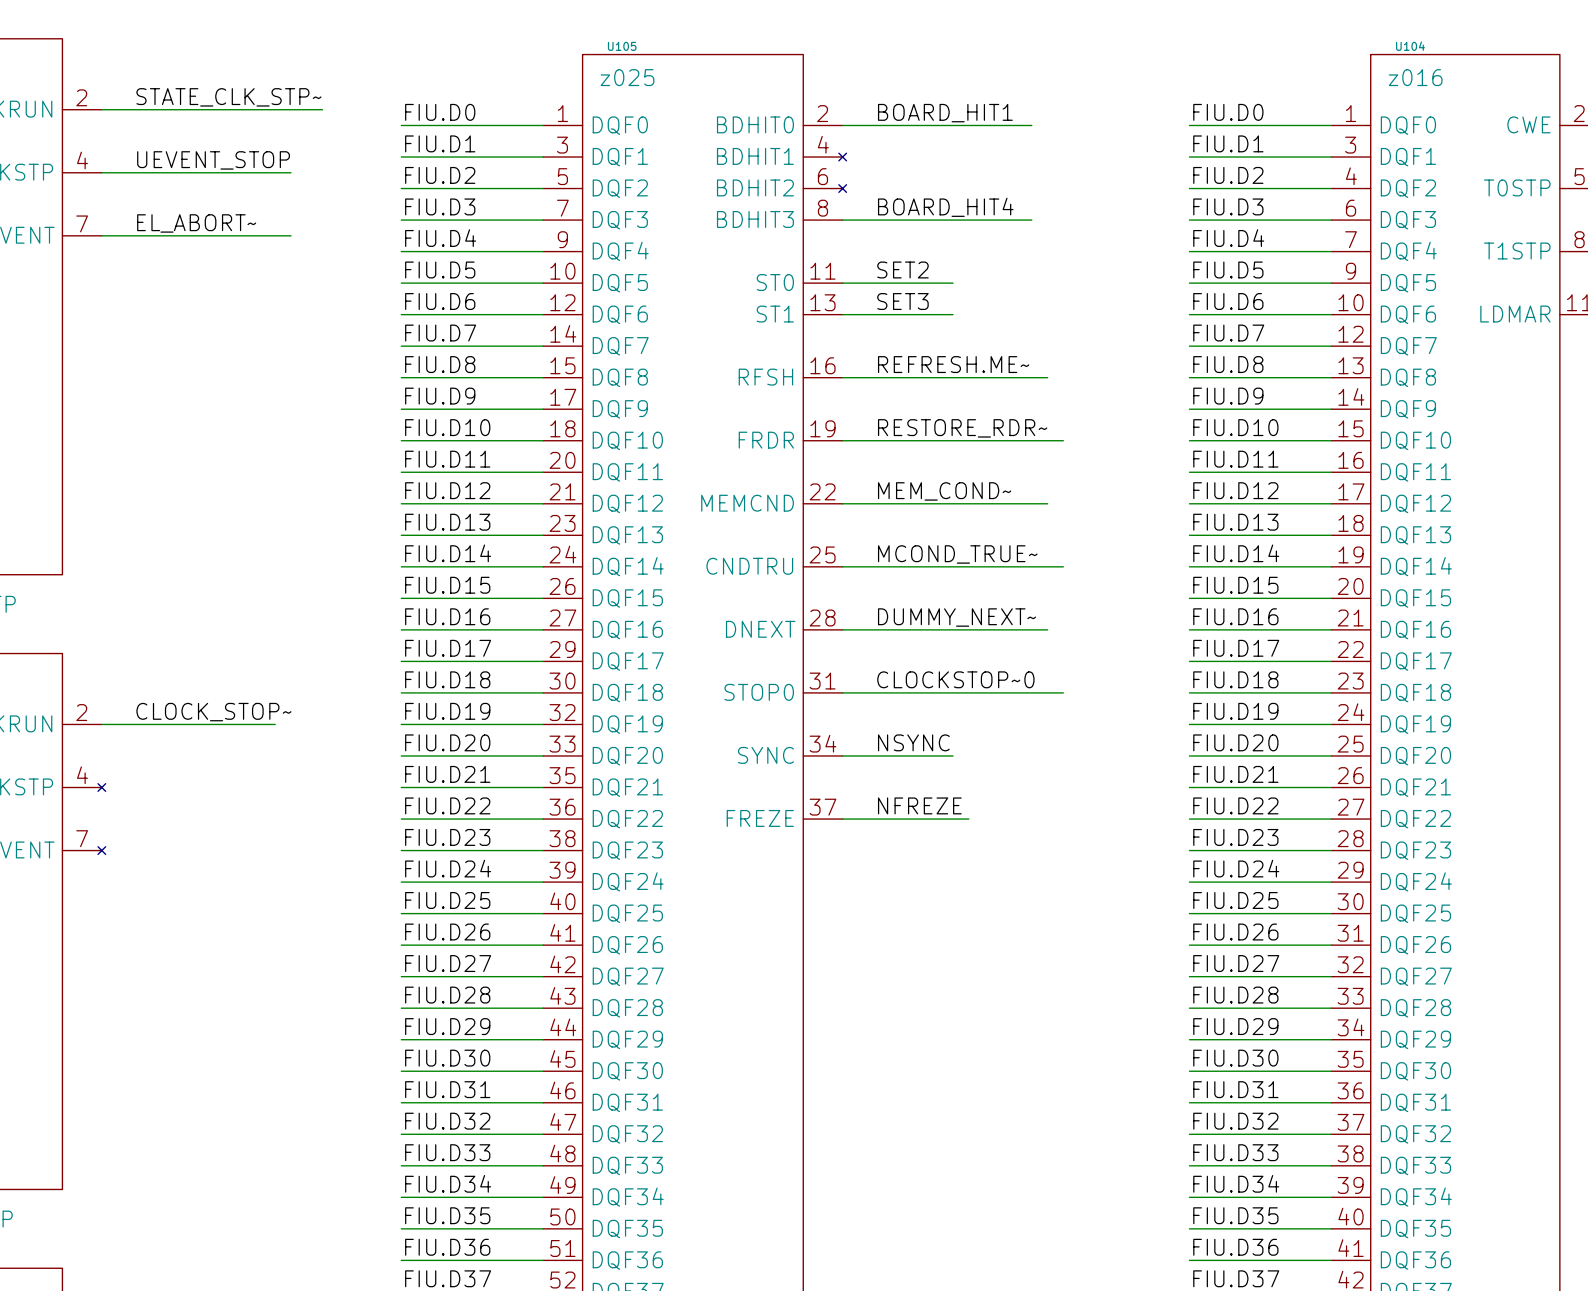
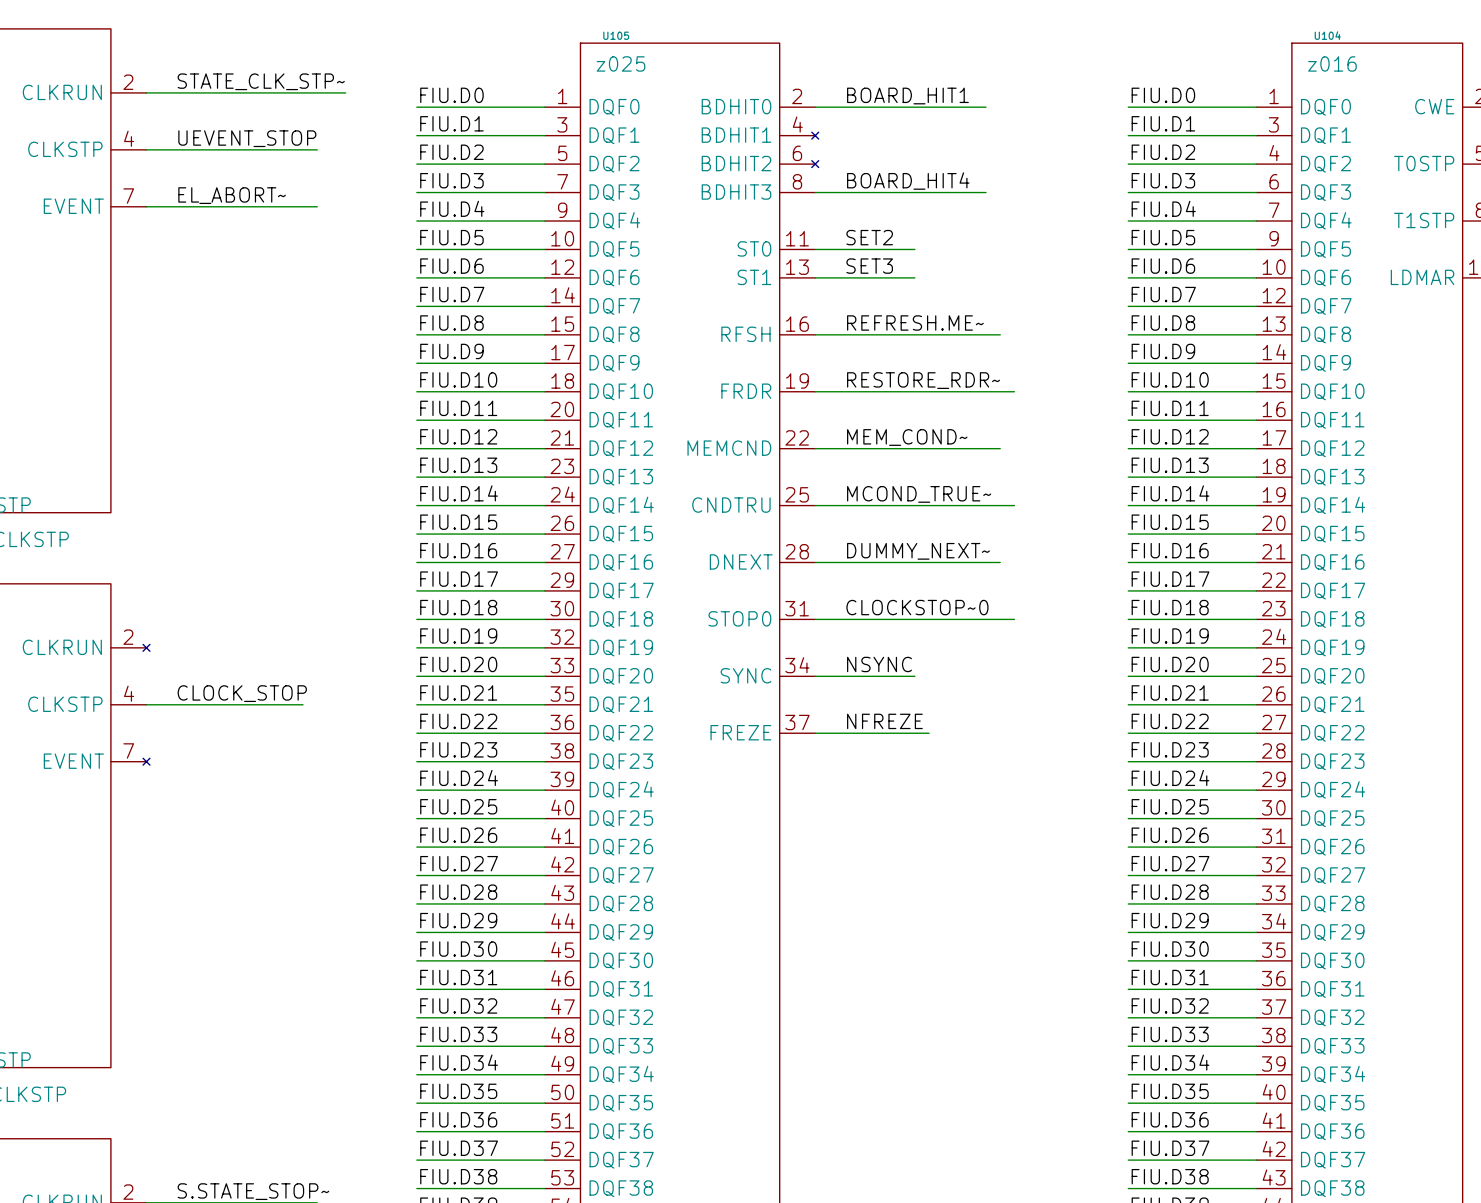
label: CLOCK_STOP~ (213, 712) -> none
wire: (101, 724) (275, 724) -> (146, 704) (303, 704)
no-connect mark: none -> (146, 647)
label: none -> CLOCK_STOP (242, 693)
no-connect mark: (101, 787) -> none

